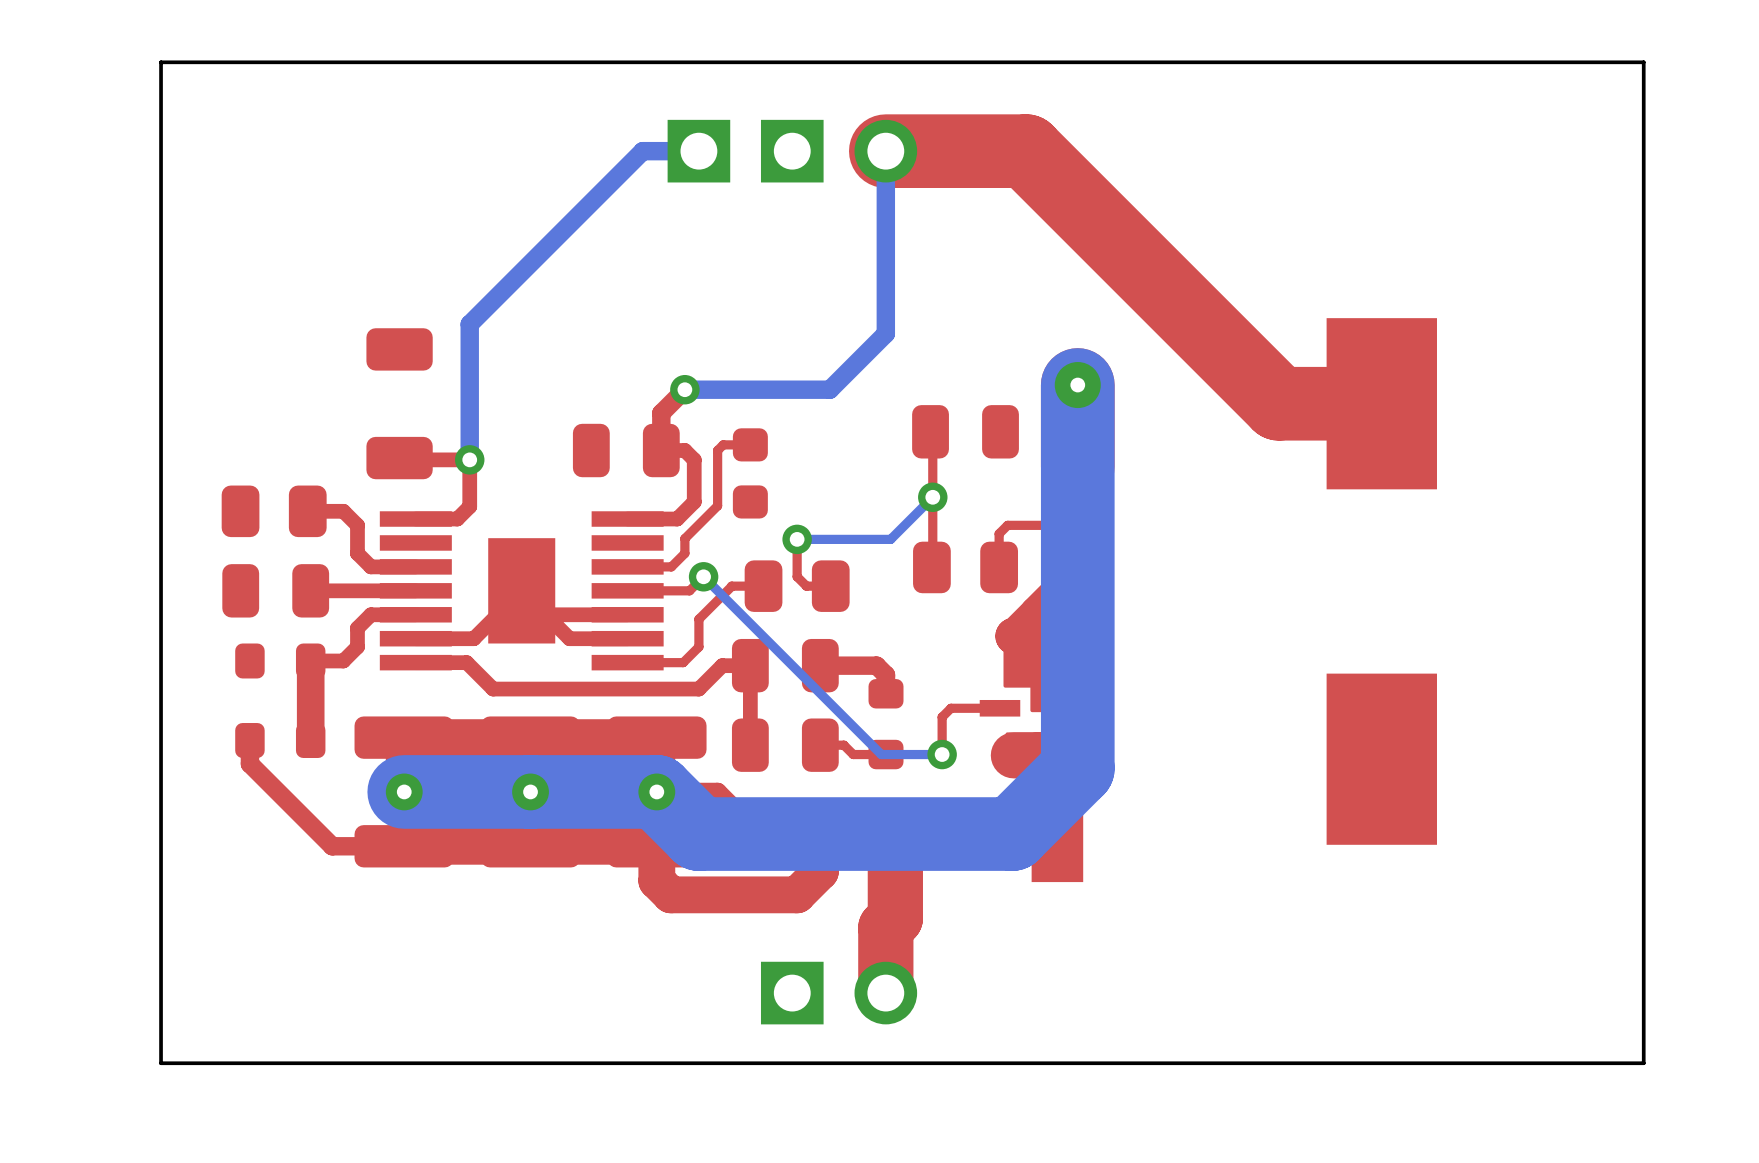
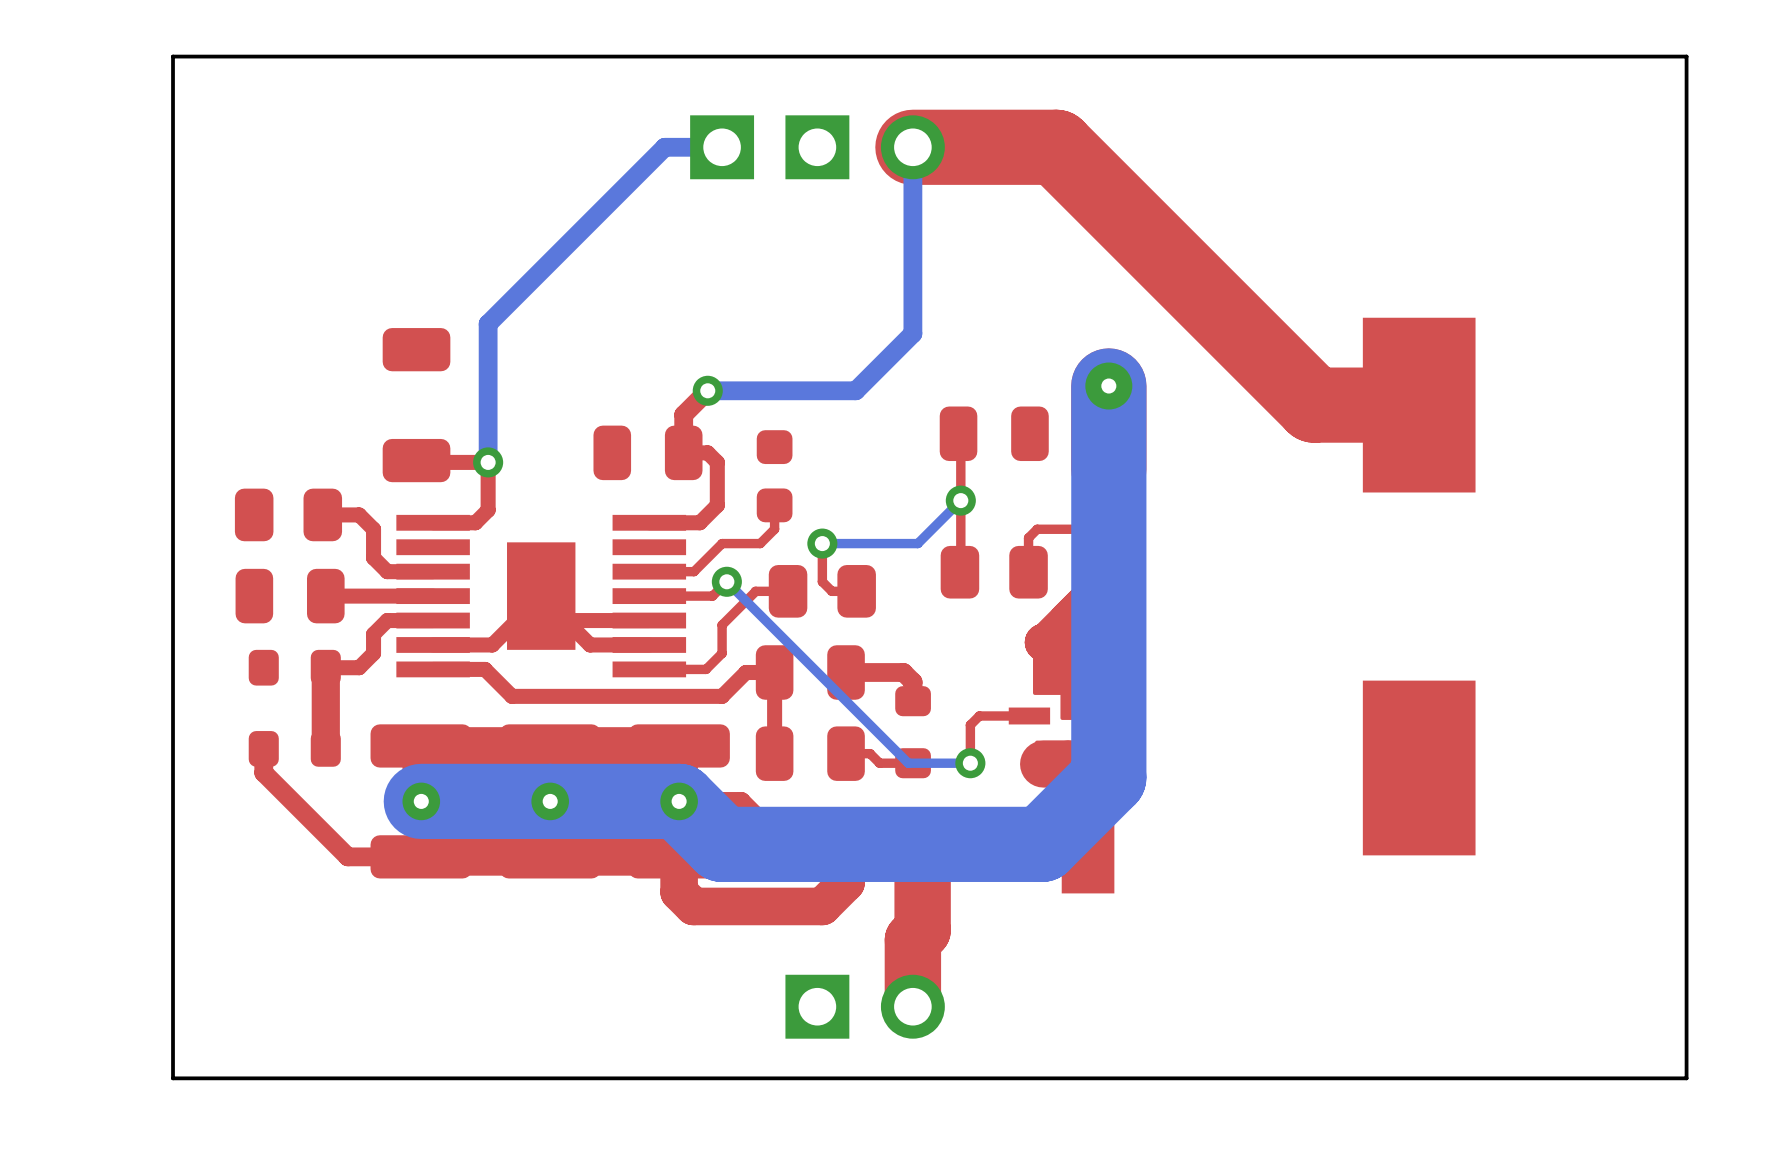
top track: (750, 444) (723, 444) (717, 450) (717, 505) (684, 538) (684, 553) -> (774, 505) (774, 529) (760, 543) (722, 543) (707, 557)

